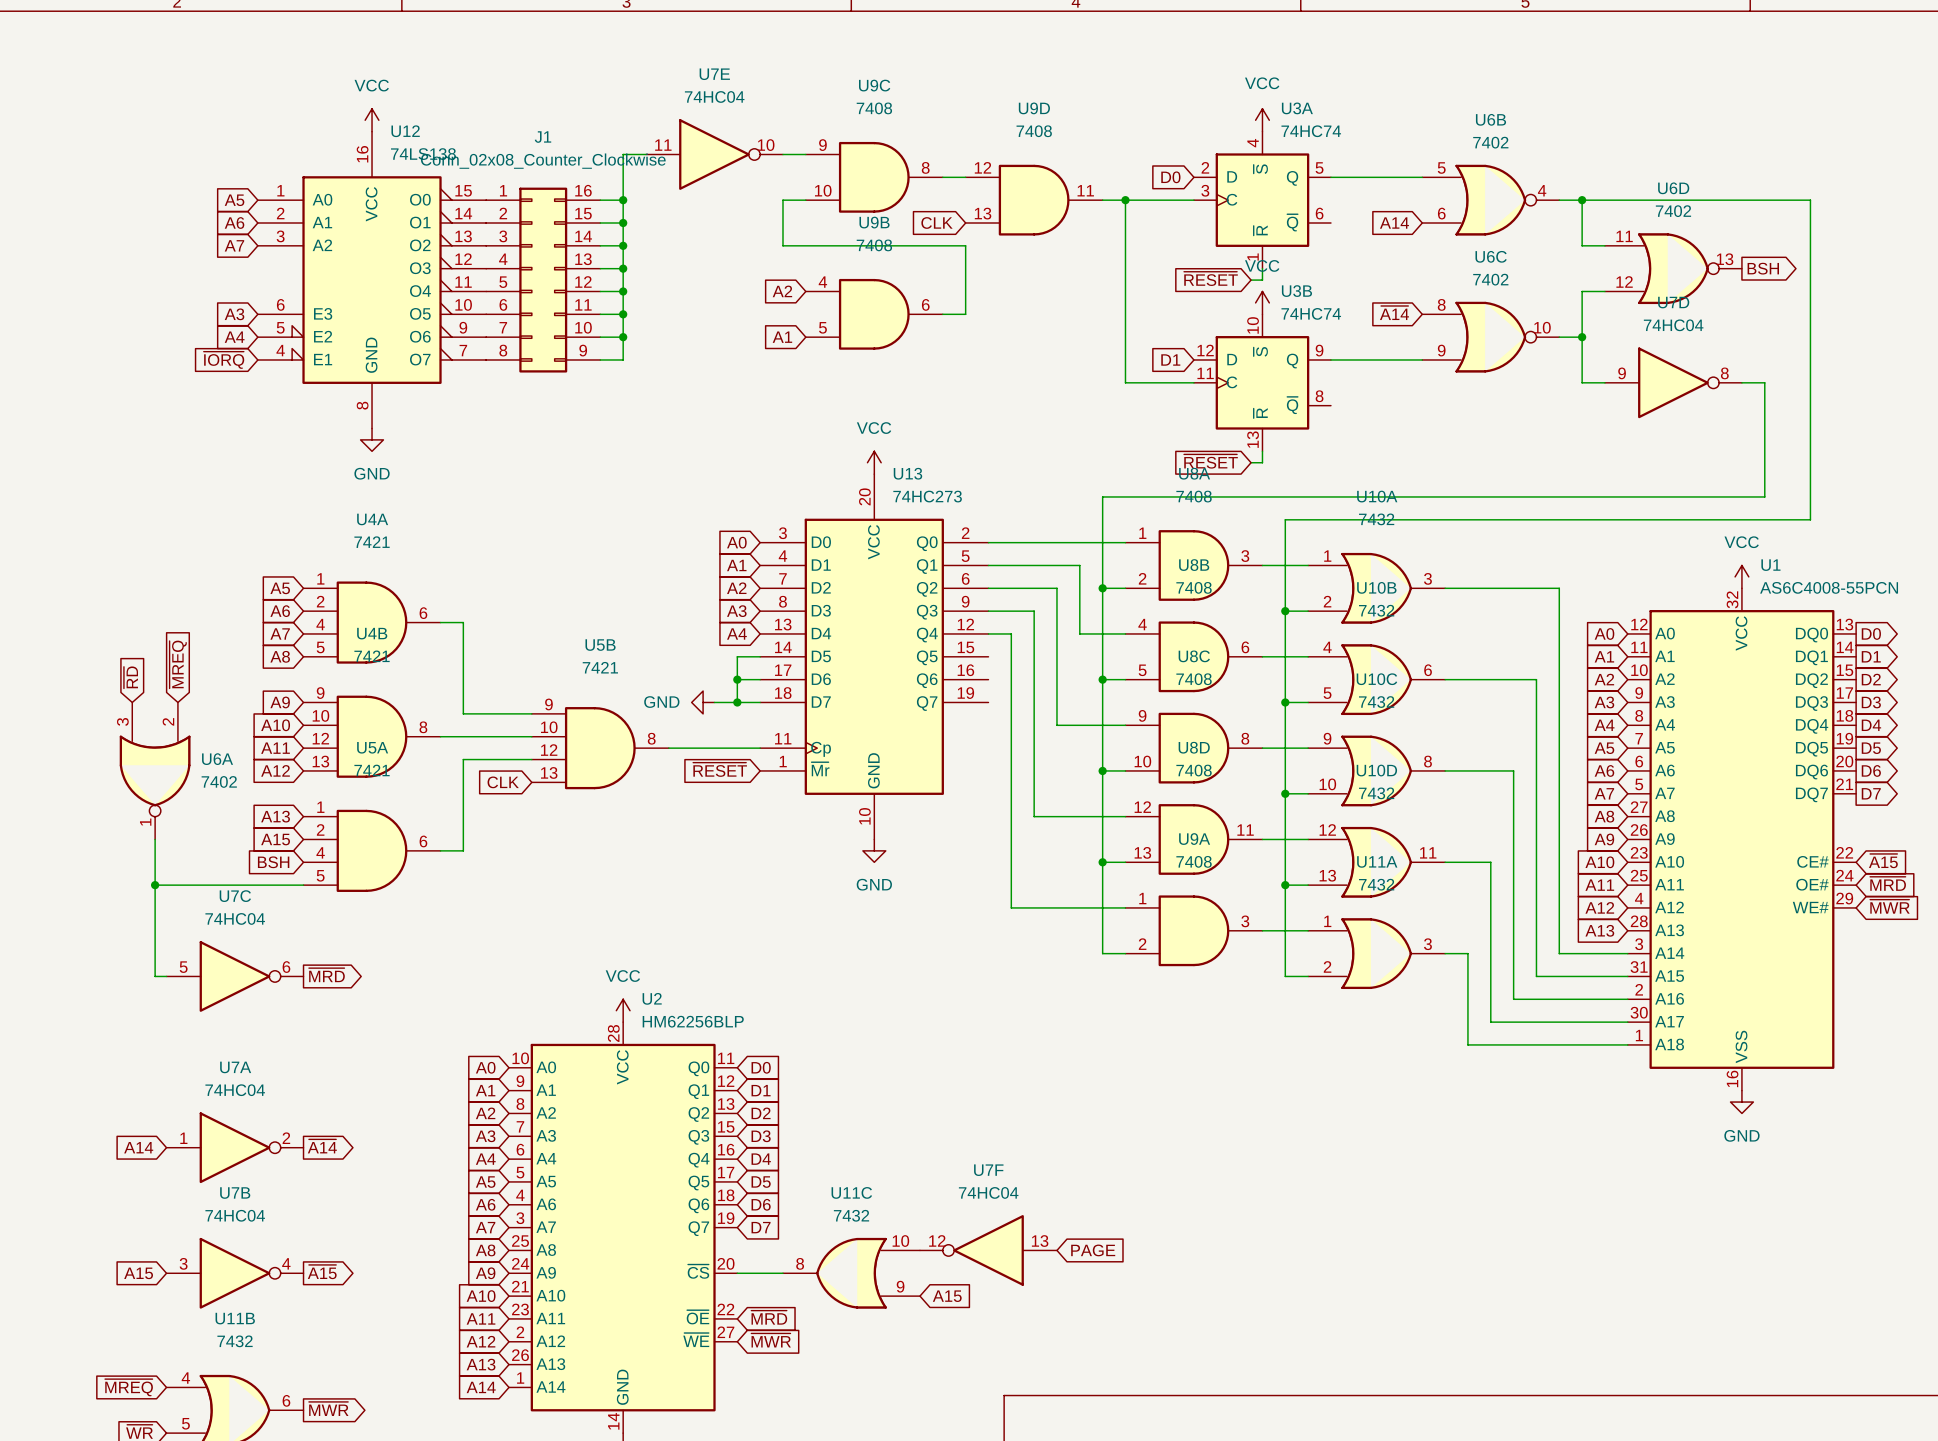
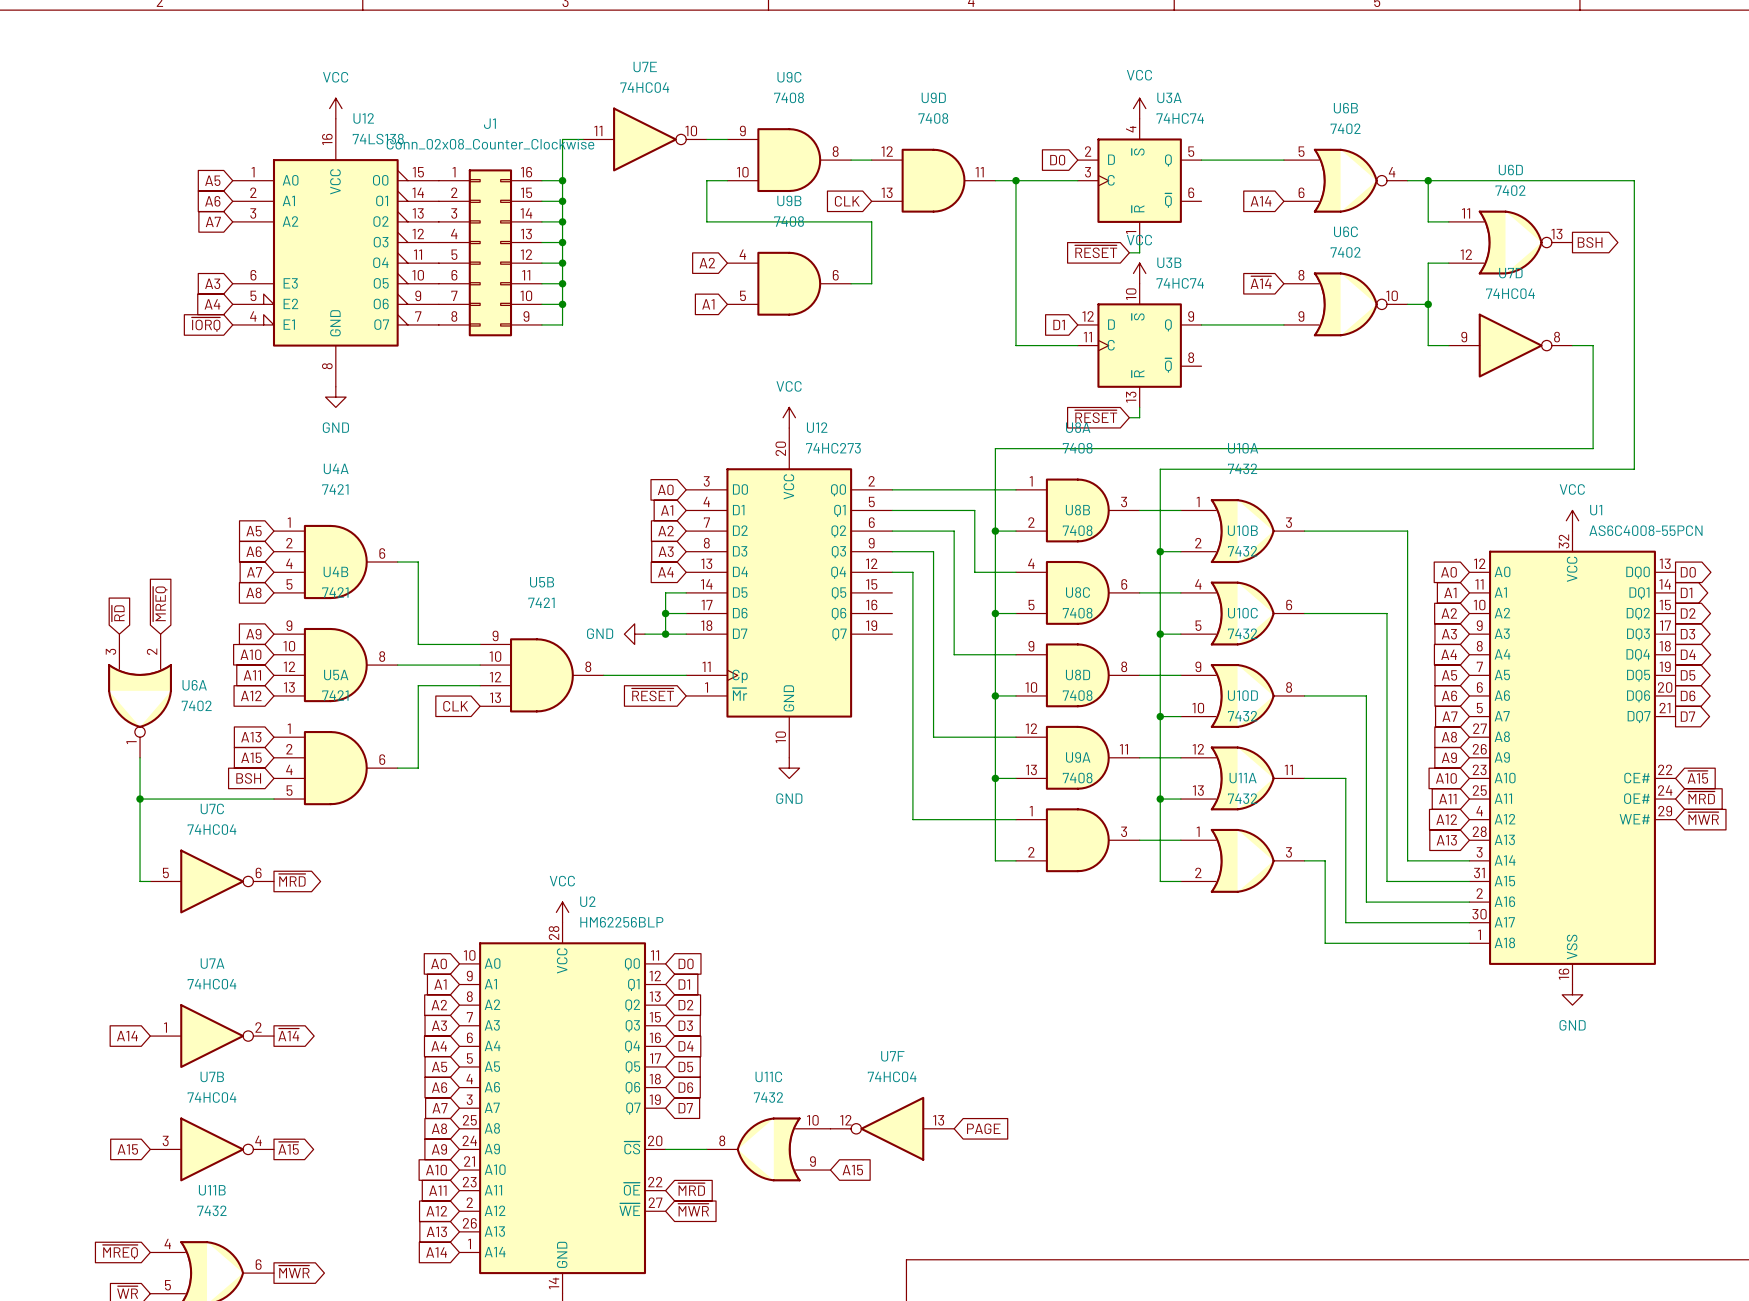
U13 name: U13 (907, 473) -> U12 (817, 427)

